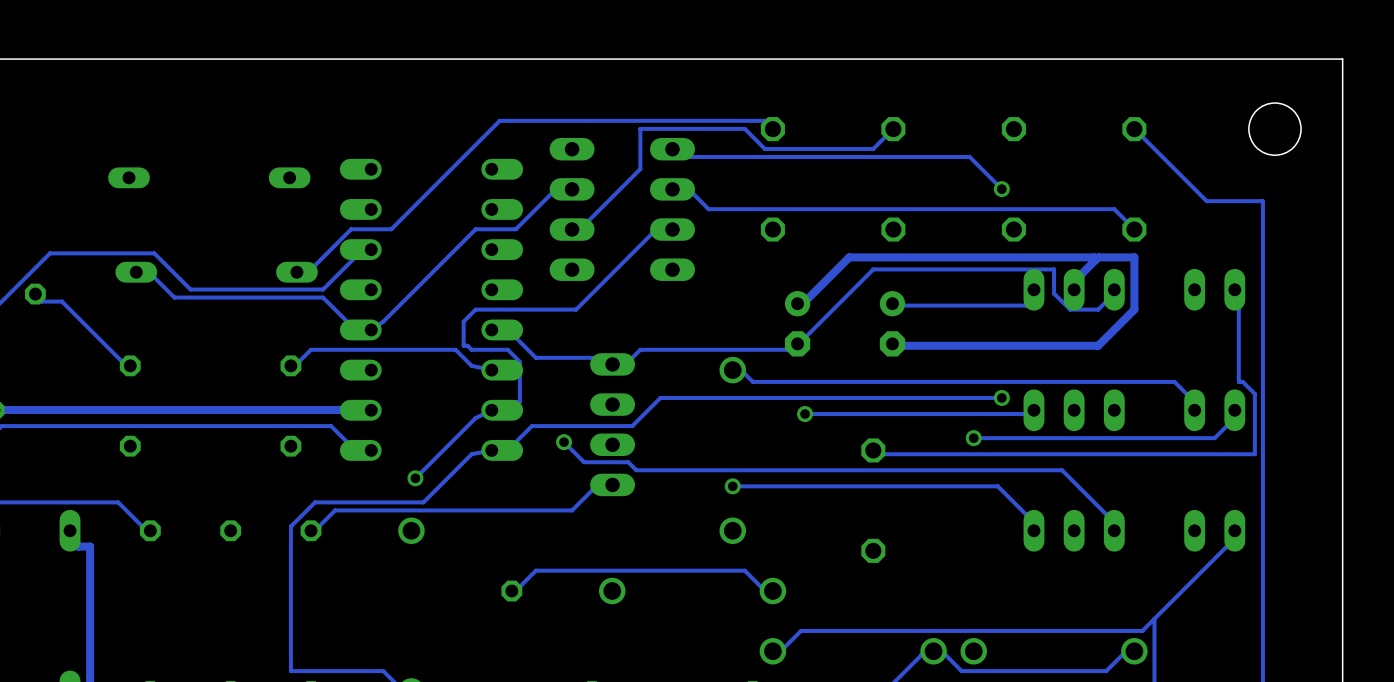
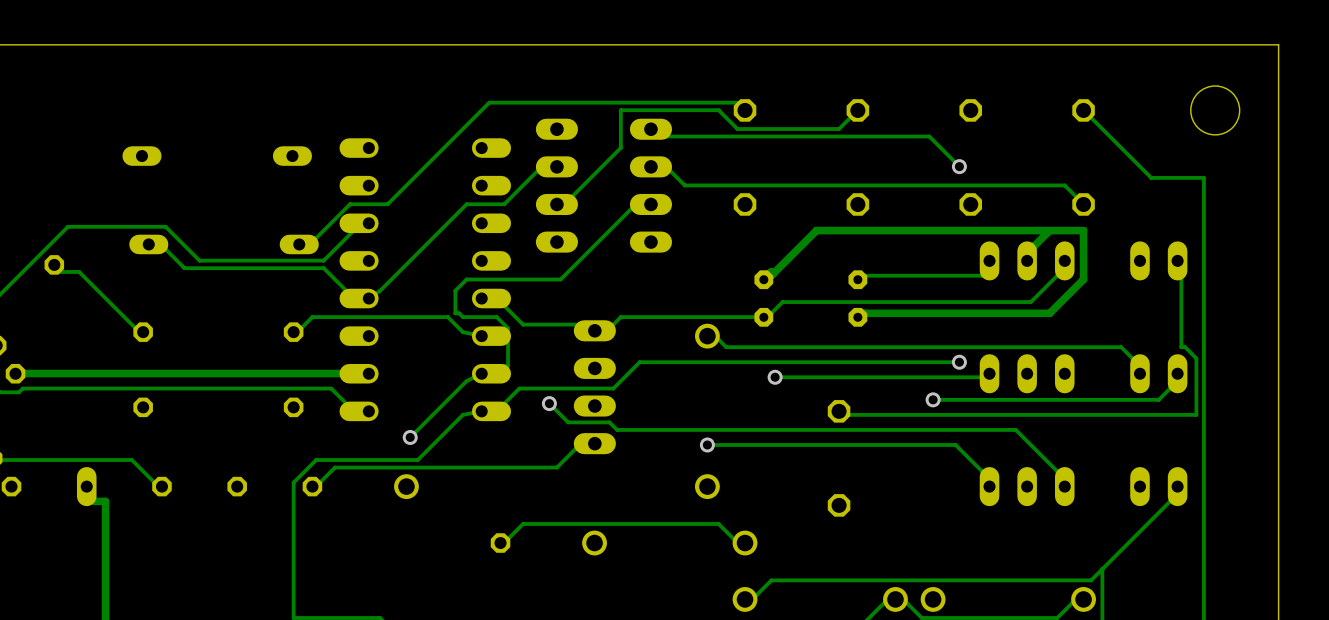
track: (1114, 289) (1114, 293) (1098, 309) (1070, 309) (1054, 293) (1054, 269) (873, 269) (792, 349) (784, 349) -> (1064, 260) (1057, 275) (1030, 302) (782, 302) (771, 313) (763, 317) (756, 317)
part footprint: [784, 291, 811, 357] -> [754, 270, 774, 327]
part footprint: [879, 291, 906, 357] -> [848, 270, 868, 327]

